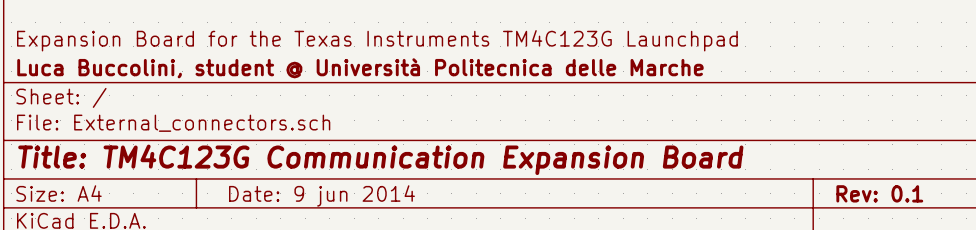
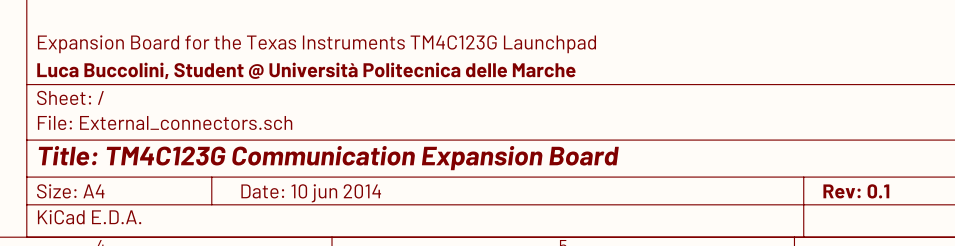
title block: Luca Buccolini, student @ Università Politecnica delle Marche (360, 68) -> Luca Buccolini, Student @ Università Politecnica delle Marche (306, 70)
title block: Date: 9 jun 2014 (321, 195) -> Date: 10 jun 2014 (311, 193)

